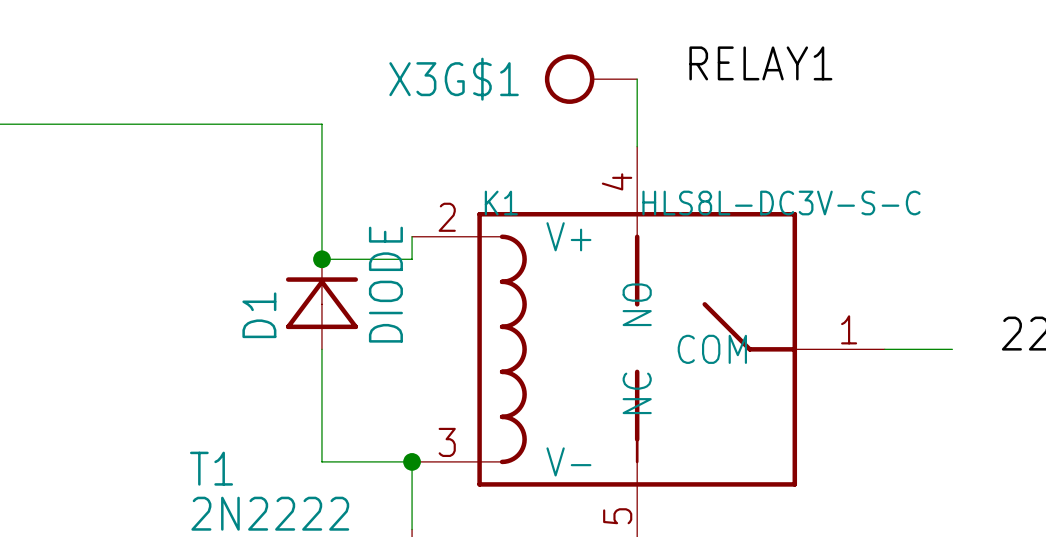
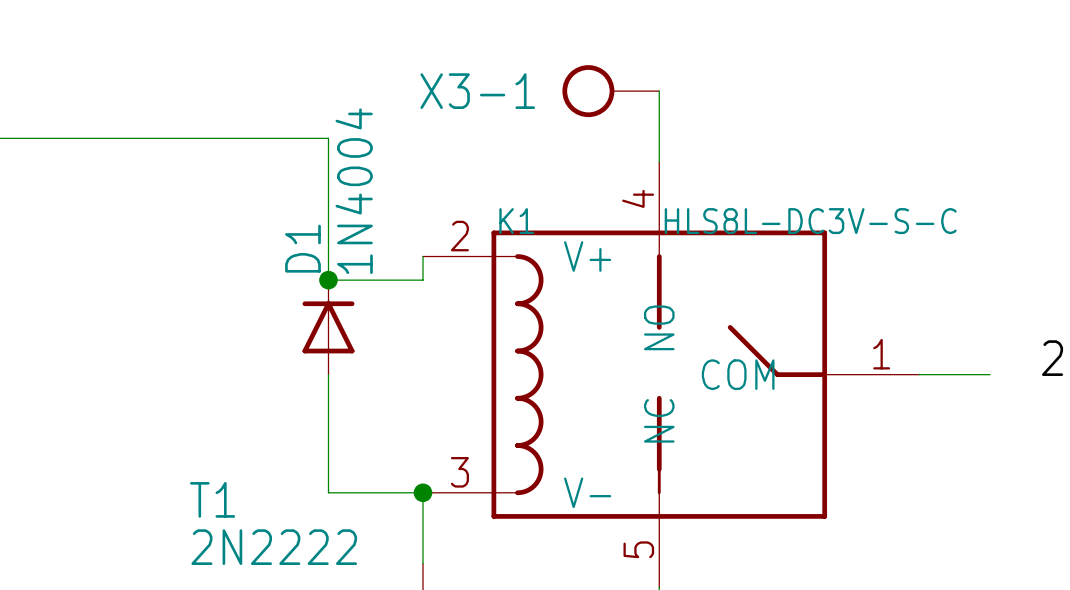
label: RELAY1 (760, 63) -> none
X3G$1 name: X3G$1 (454, 79) -> X3-1 (477, 91)
D1 symbol: [285, 259, 359, 350] -> [302, 280, 355, 375]
D1 value: DIODE (385, 284) -> 1N4004 (354, 191)
D1 name position: D1 (259, 315) -> D1 (302, 248)

